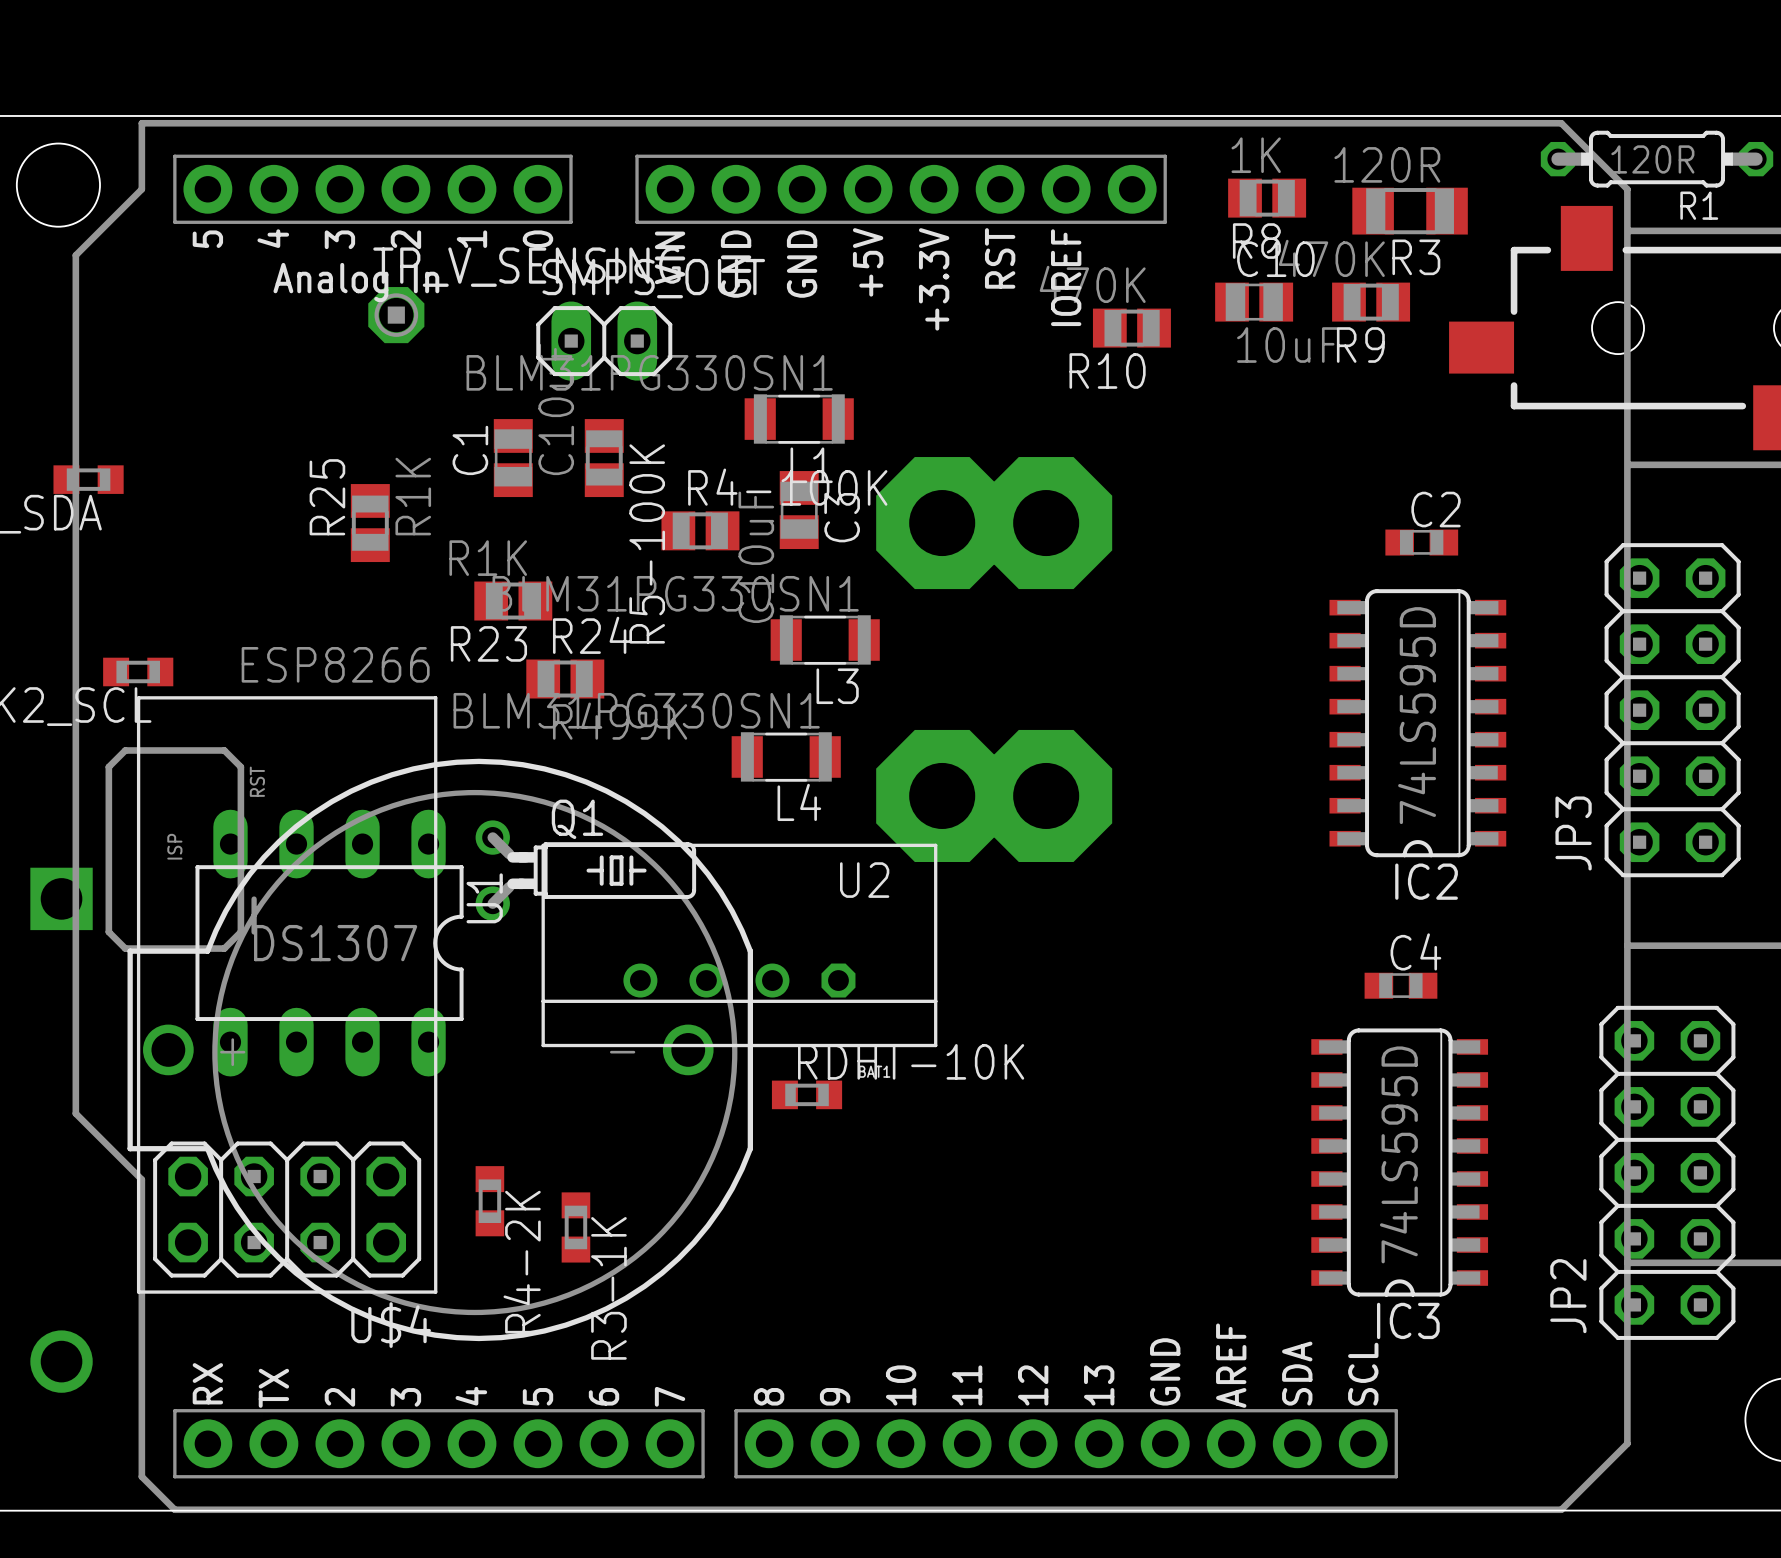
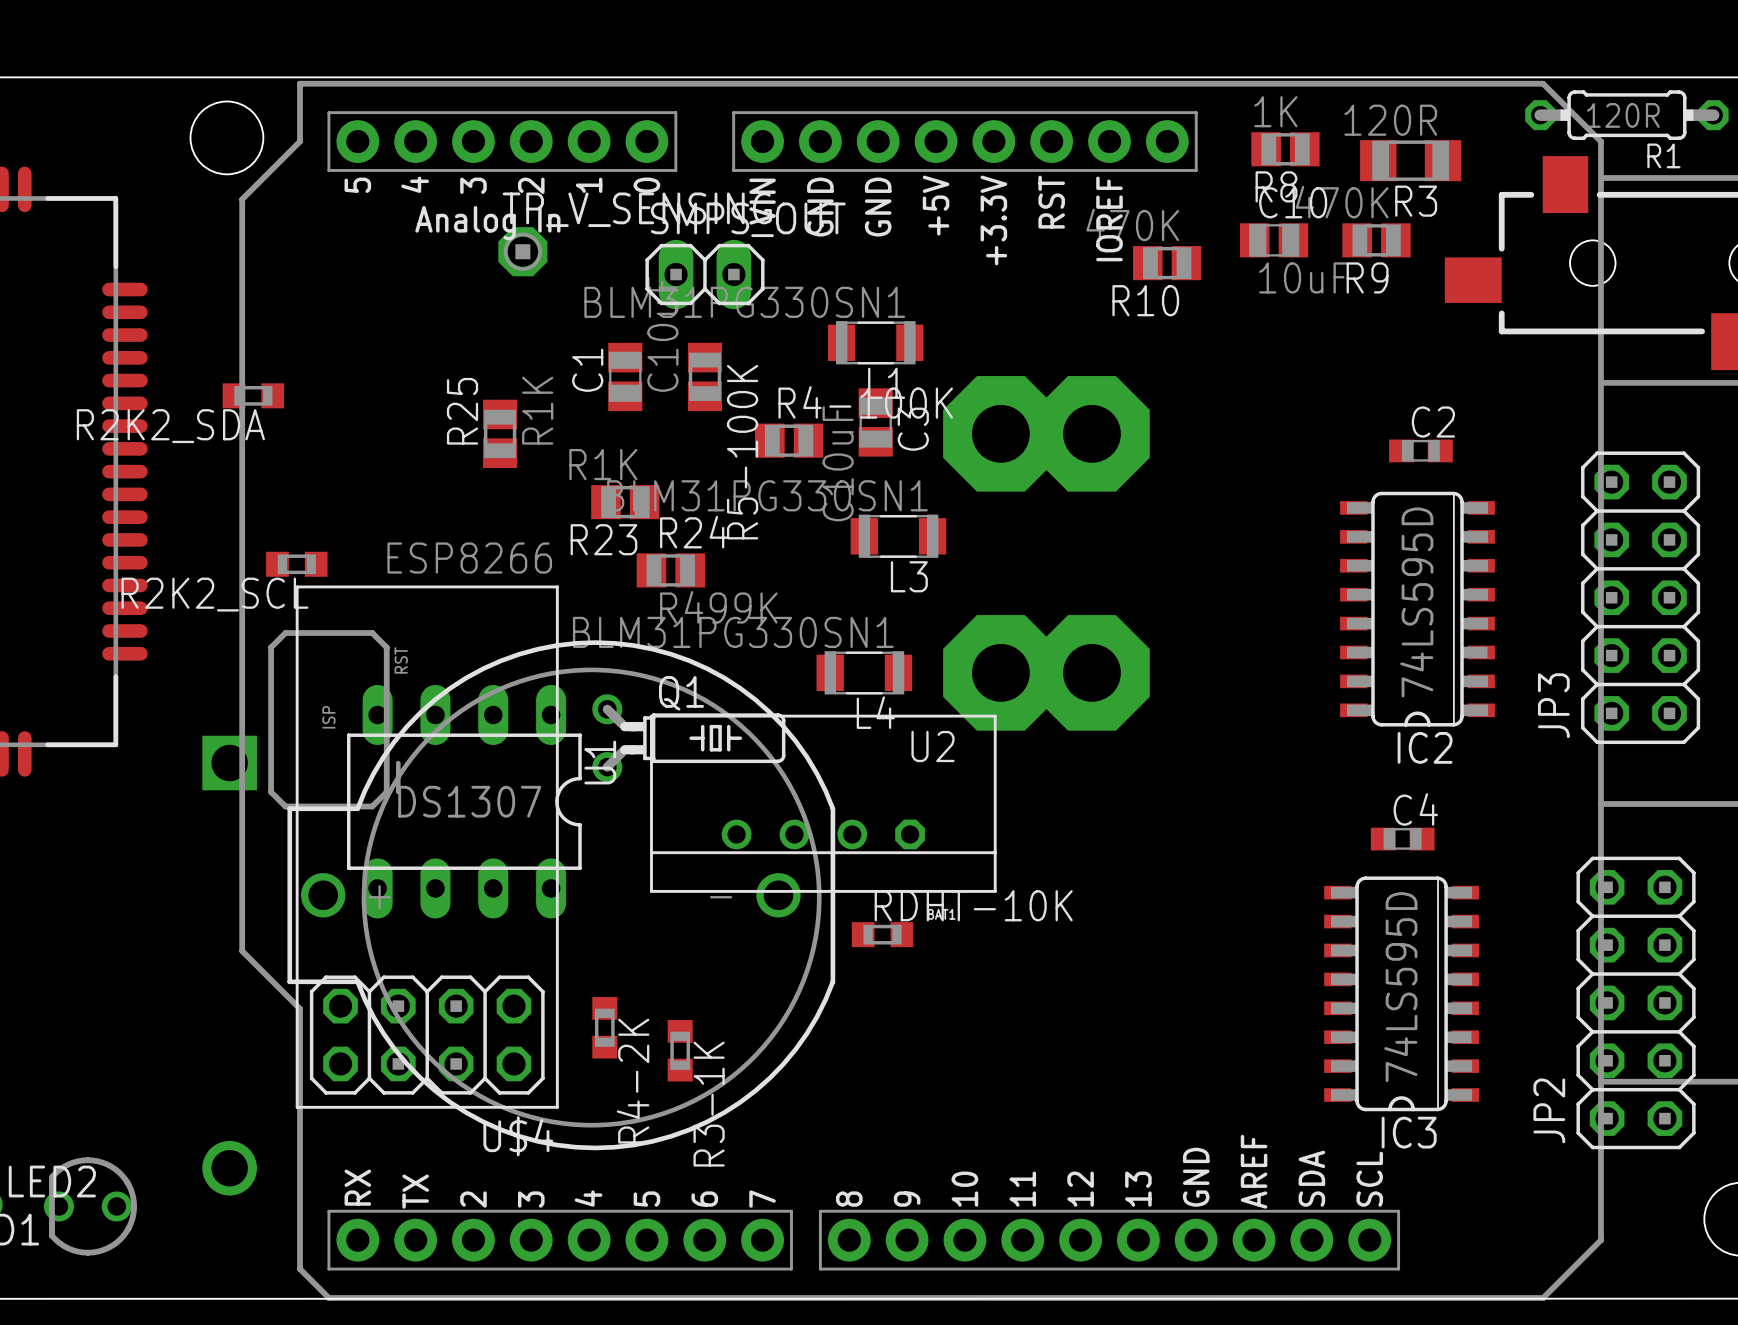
L4 position: (786, 756) -> (864, 672)

